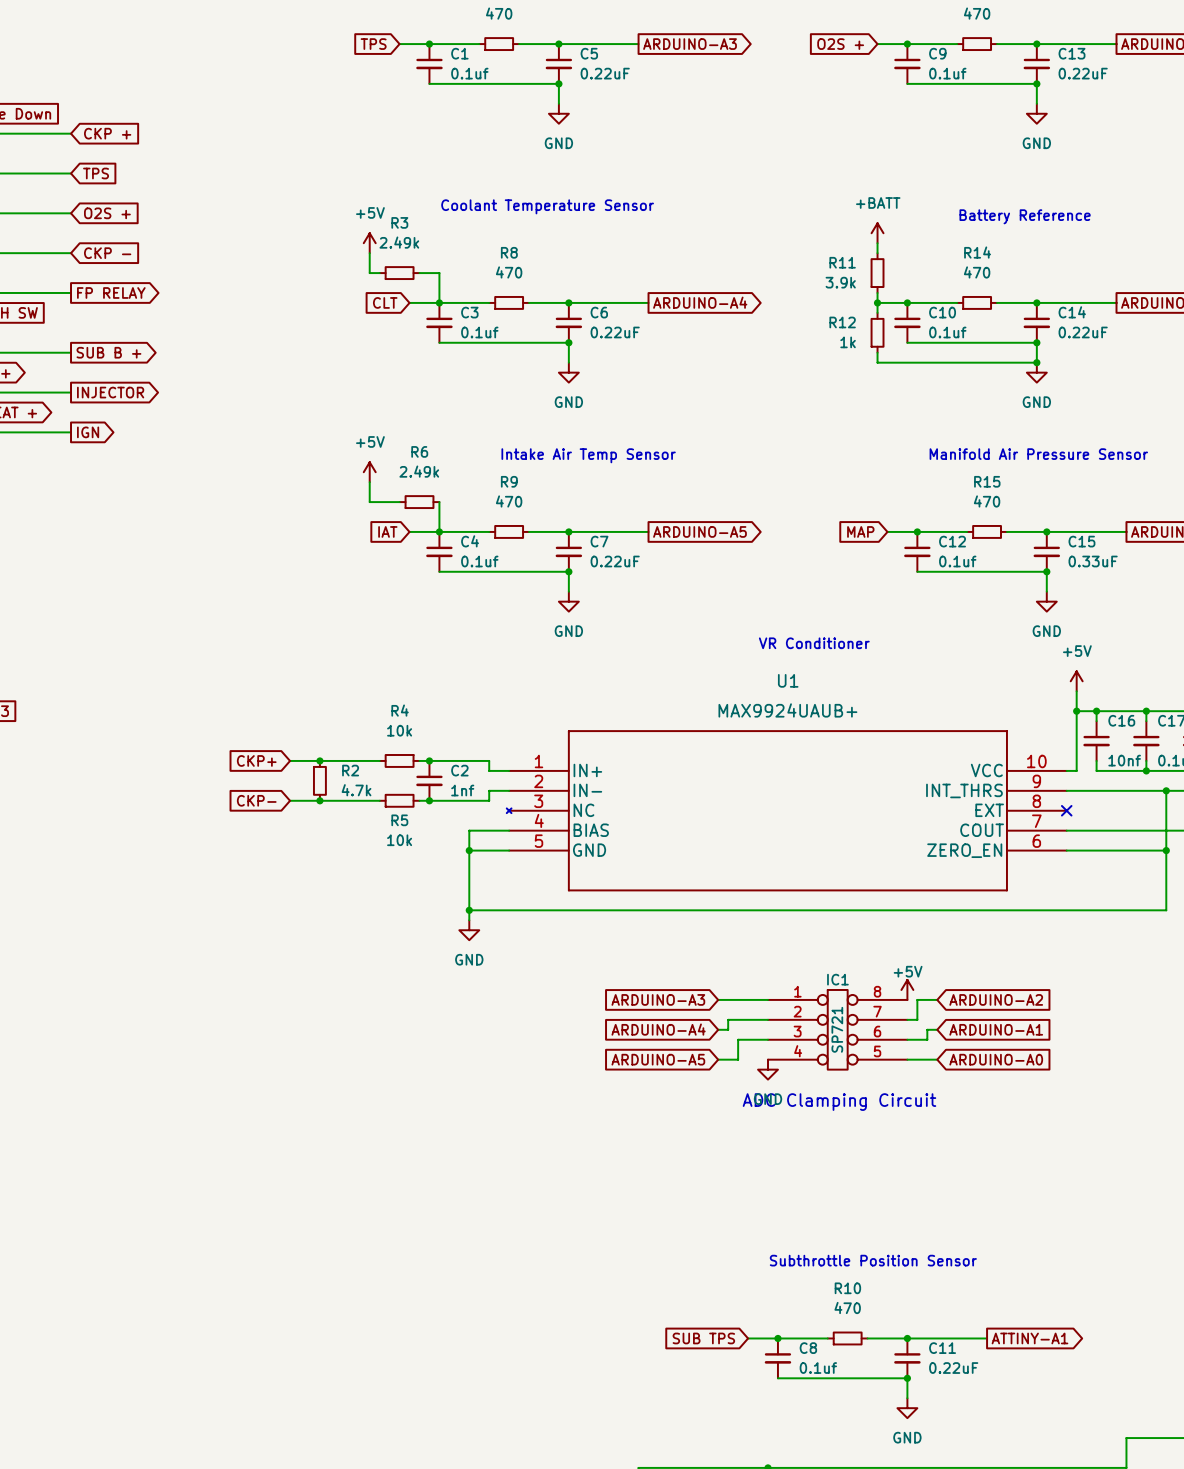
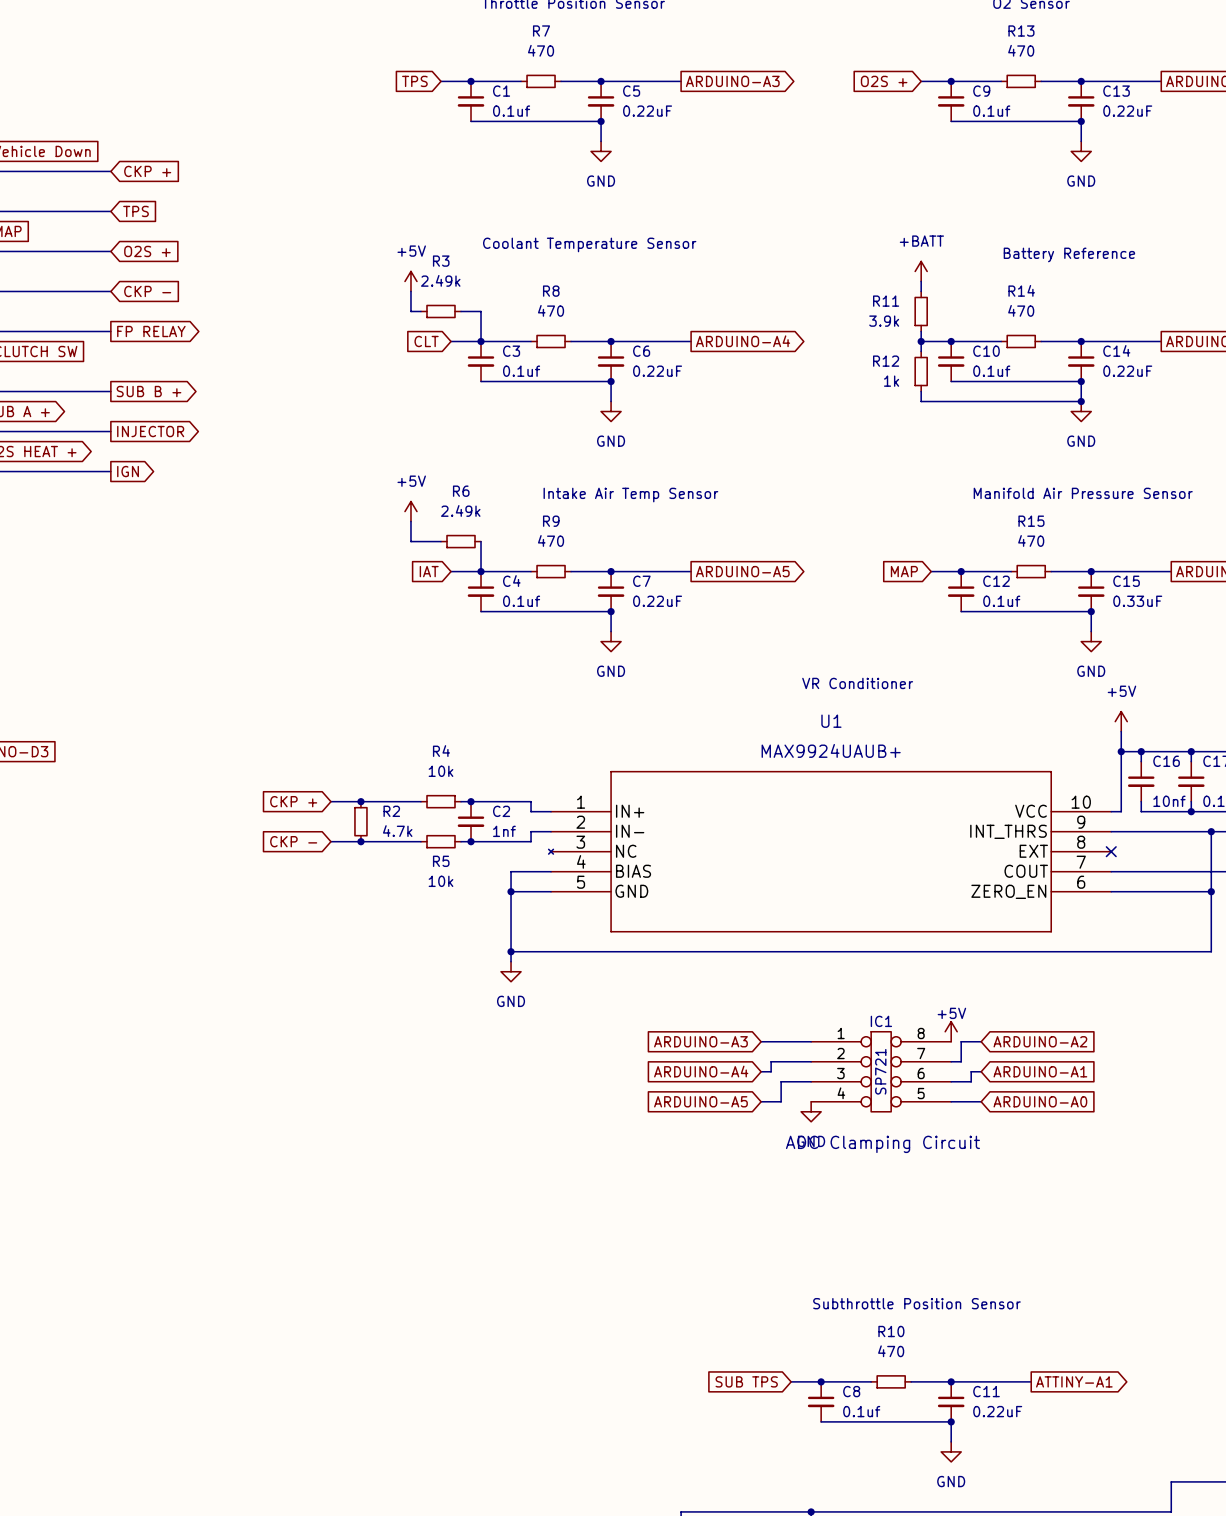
global label: CKP+ (256, 760) -> CKP + (293, 801)
global label: CKP- (256, 800) -> CKP - (293, 841)

